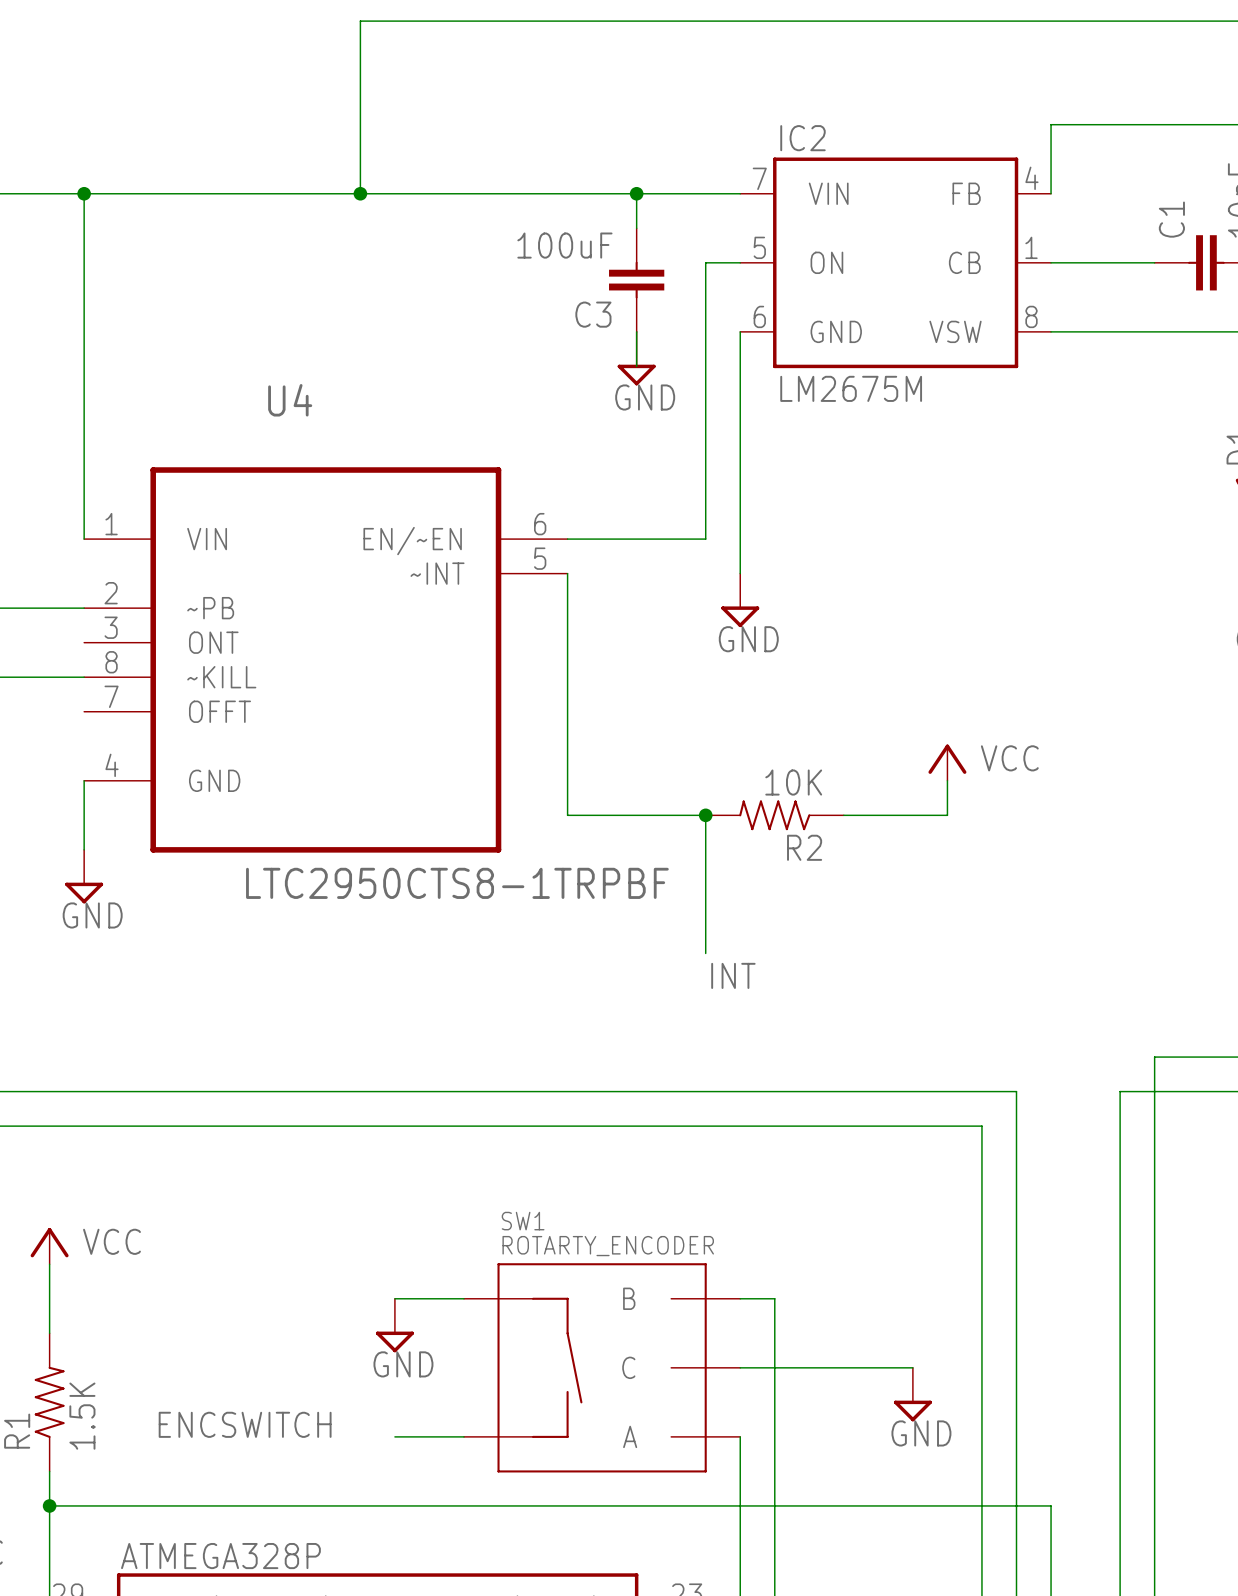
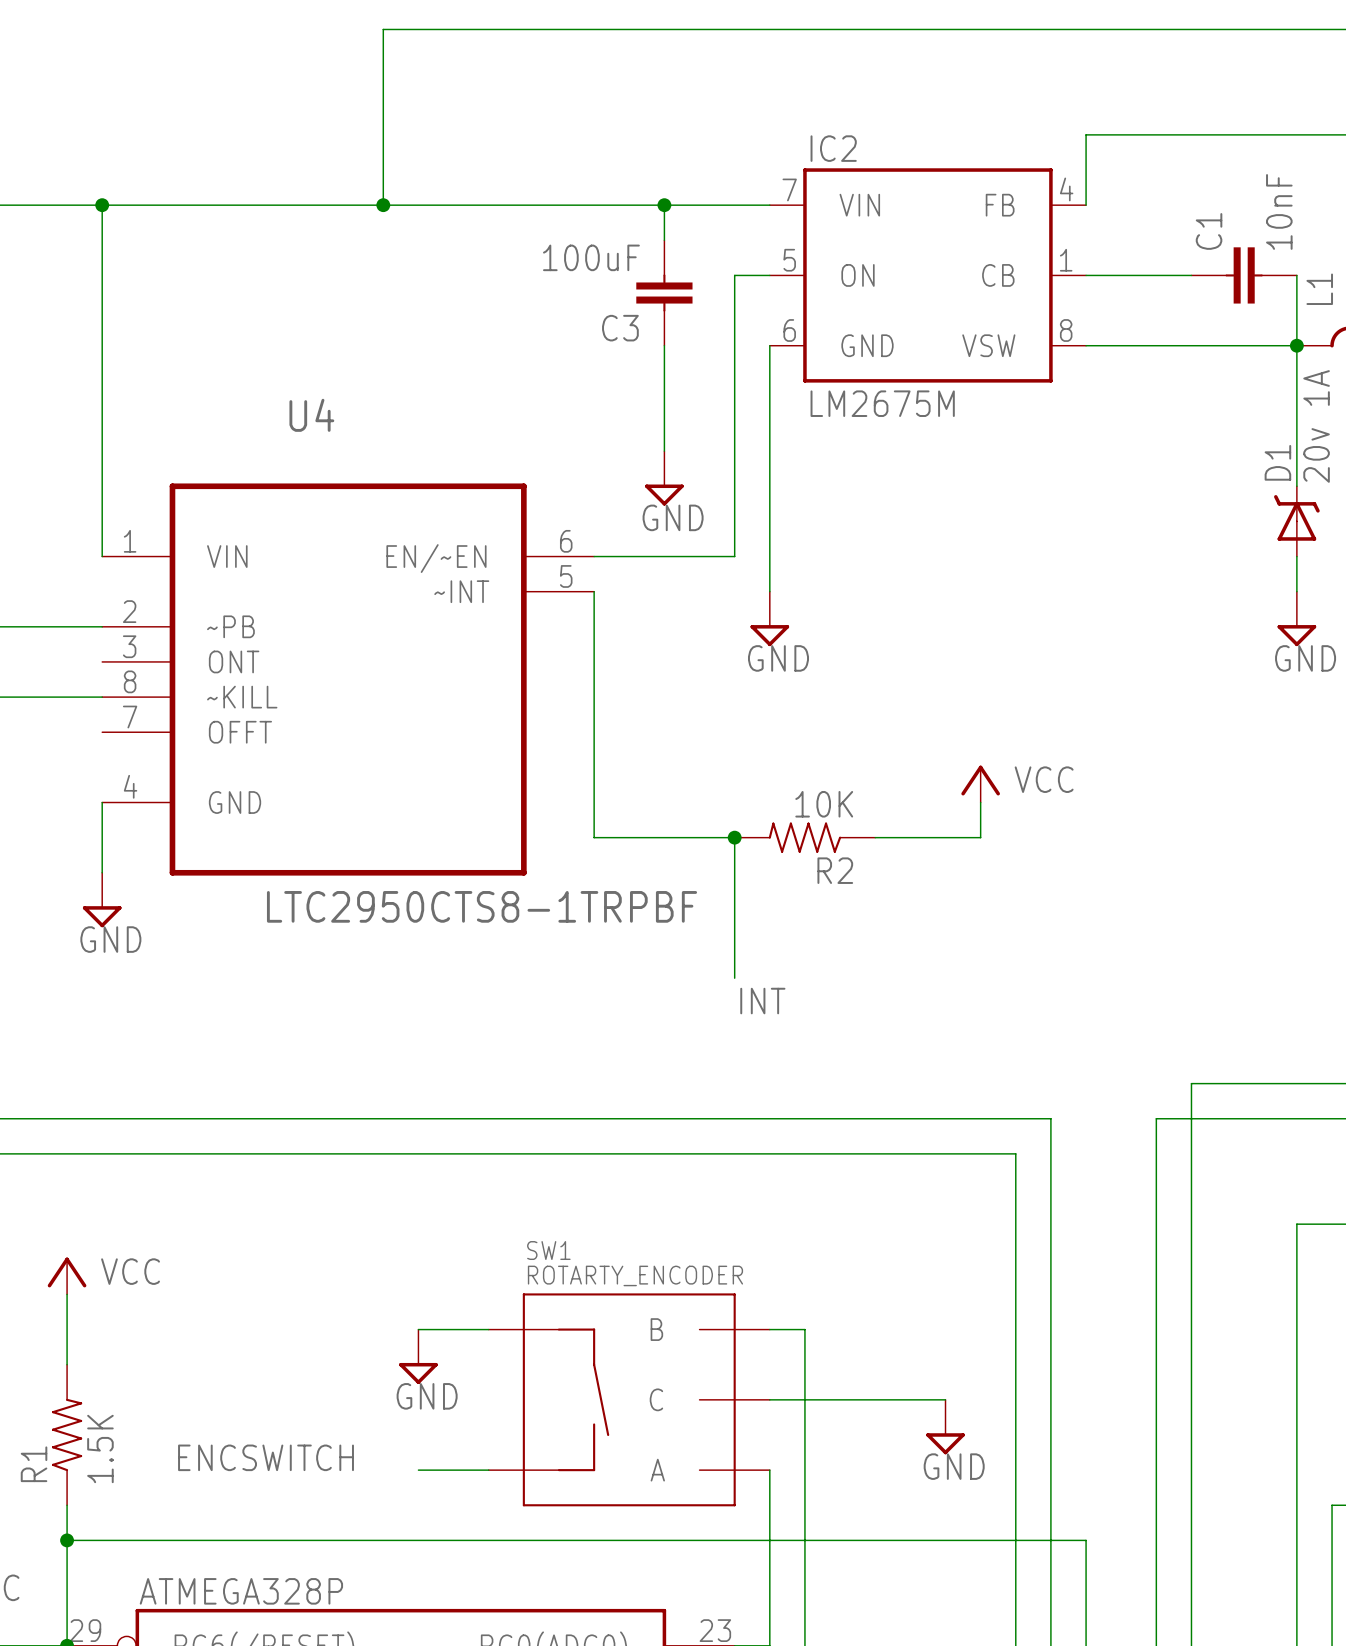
power symbol position: GND (636, 358) -> GND (664, 478)
wire: none -> (664, 380) (664, 451)

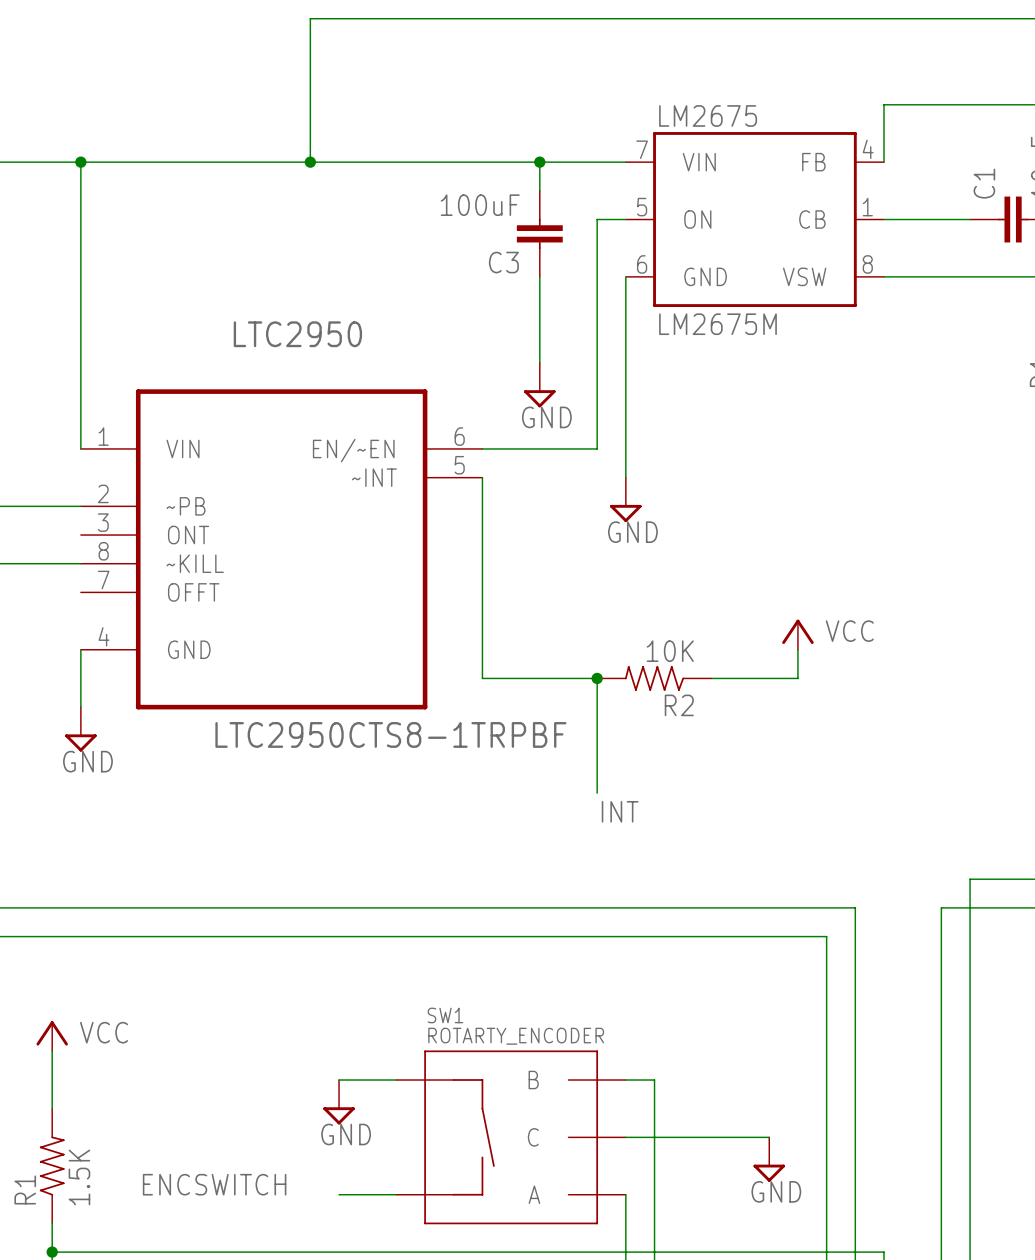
IC2 name: IC2 (833, 148) -> LM2675 (708, 115)
U4 name: U4 (311, 415) -> LTC2950 (297, 334)

